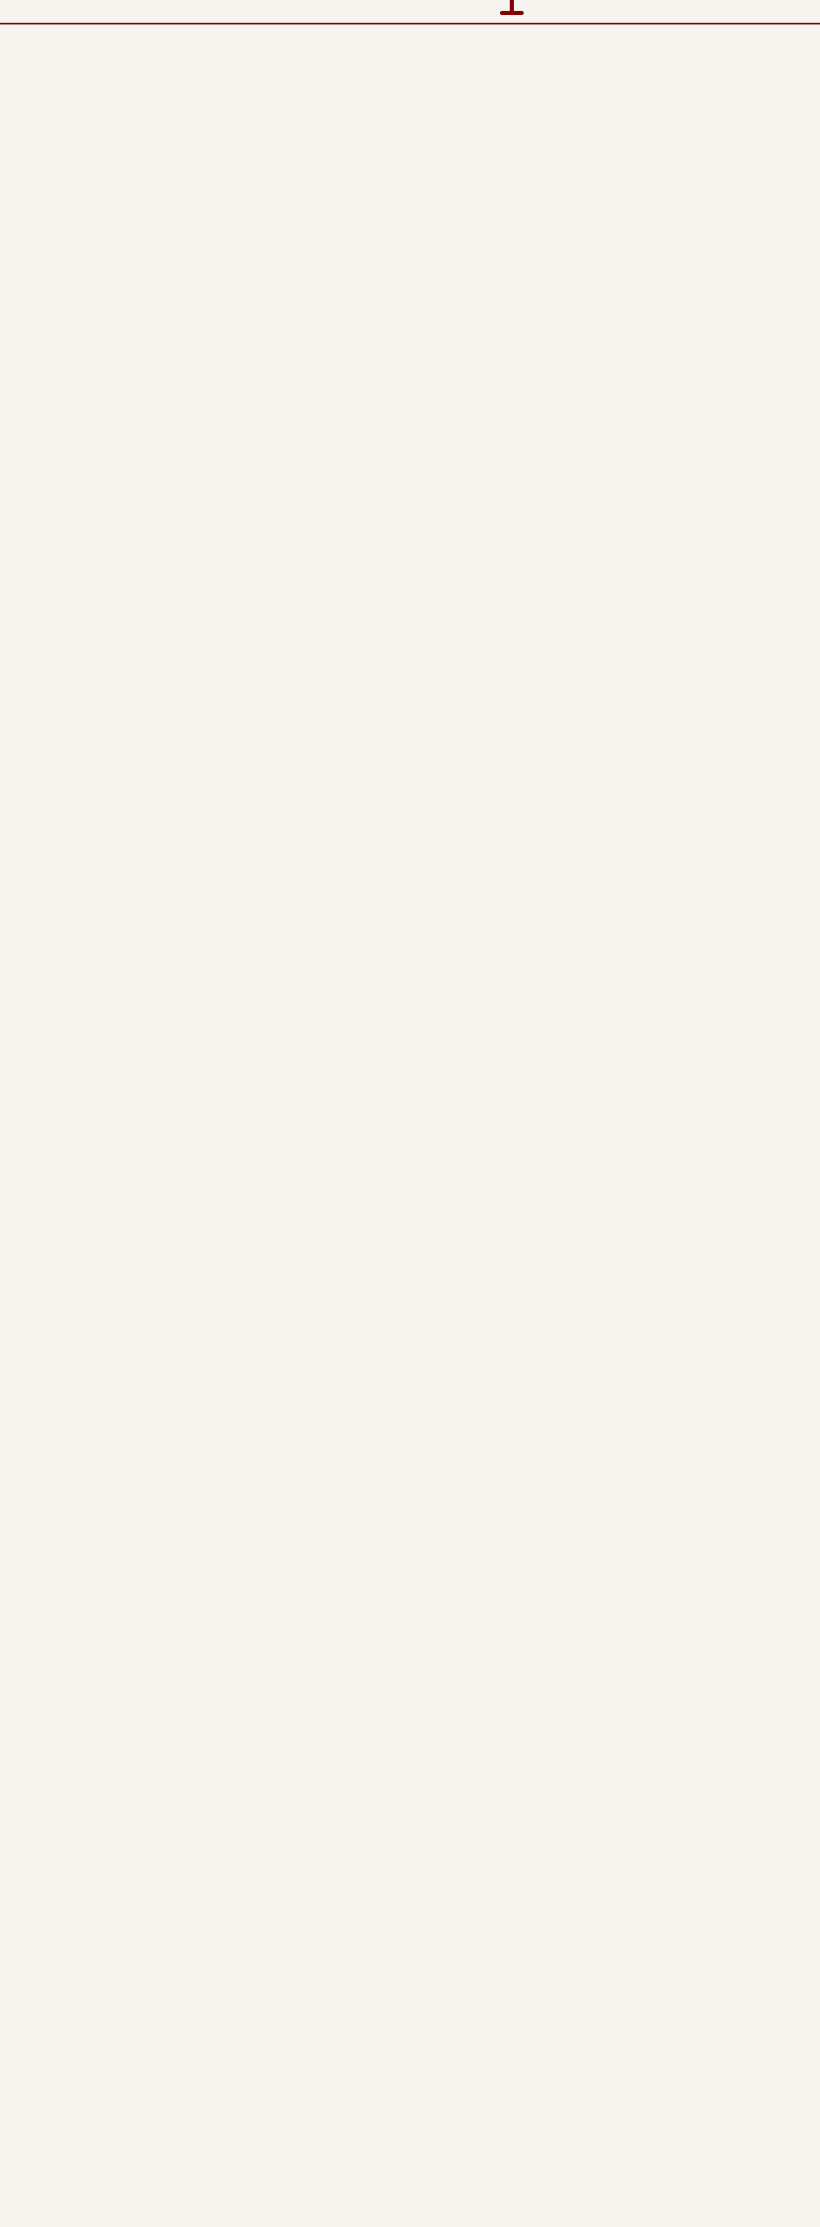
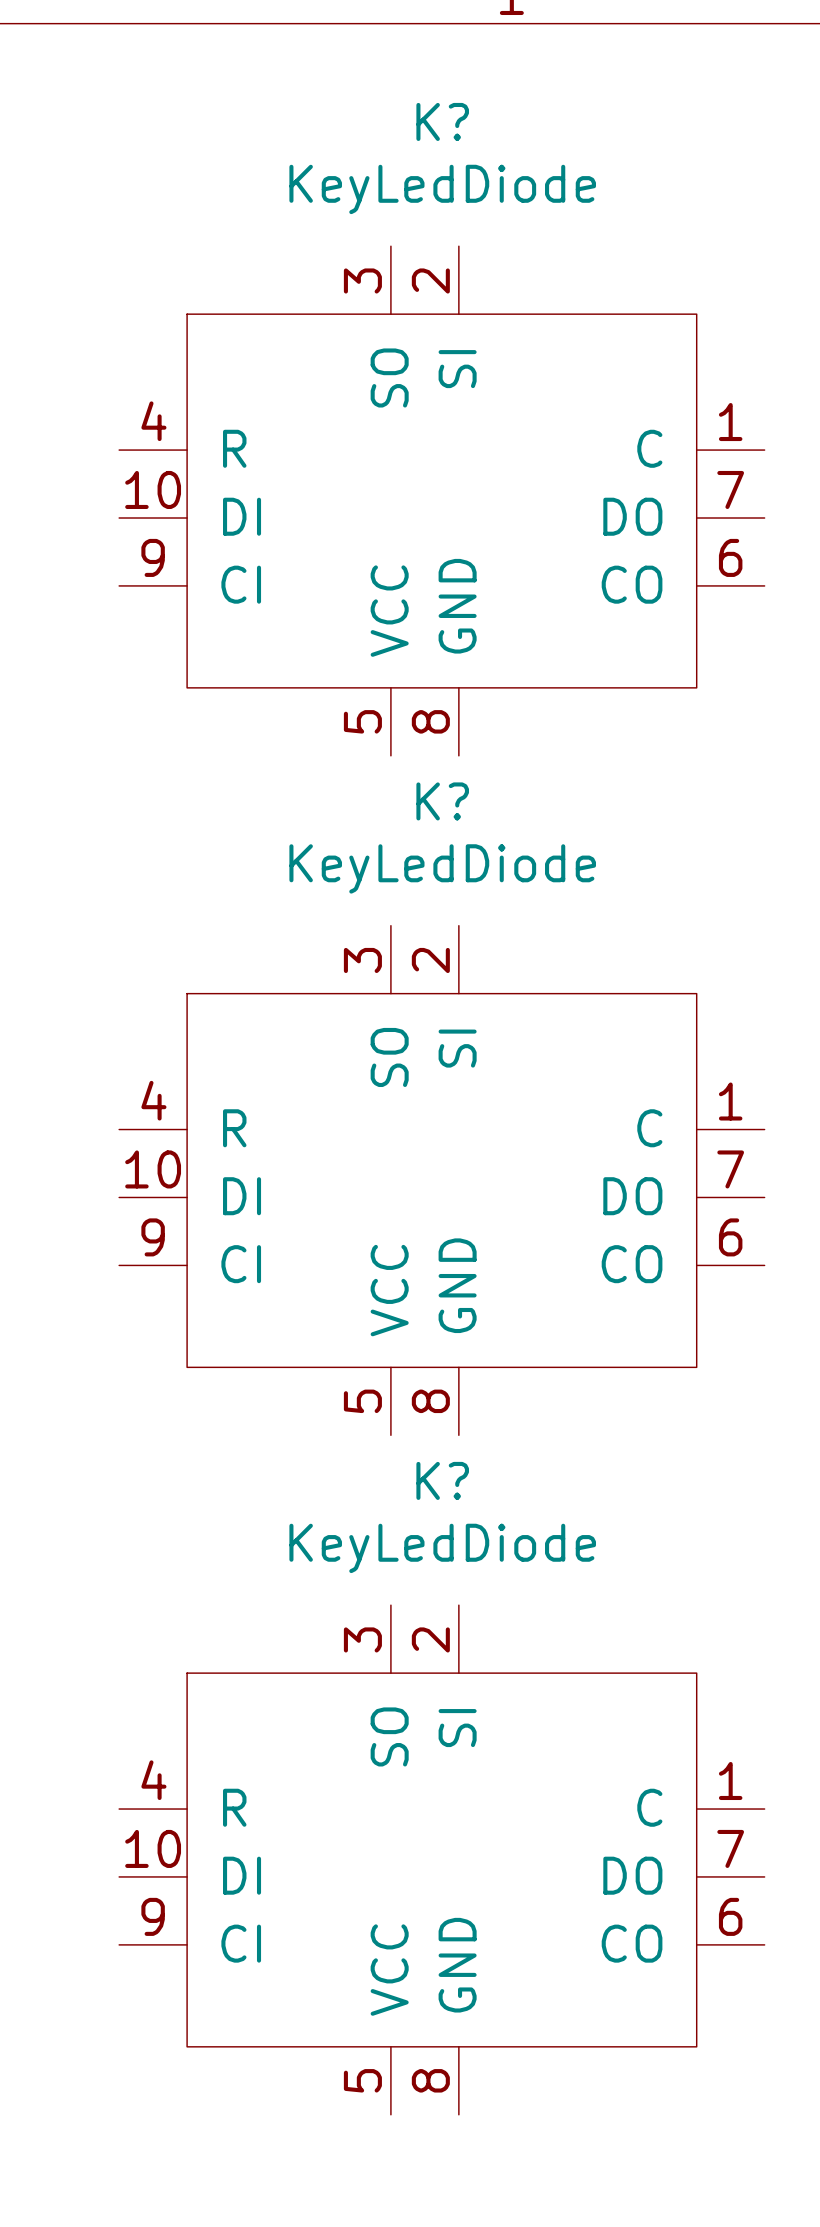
K?: none -> KeyLedDiode (441, 501)
K?: none -> KeyLedDiode (441, 1180)
K?: none -> KeyLedDiode (441, 1859)

